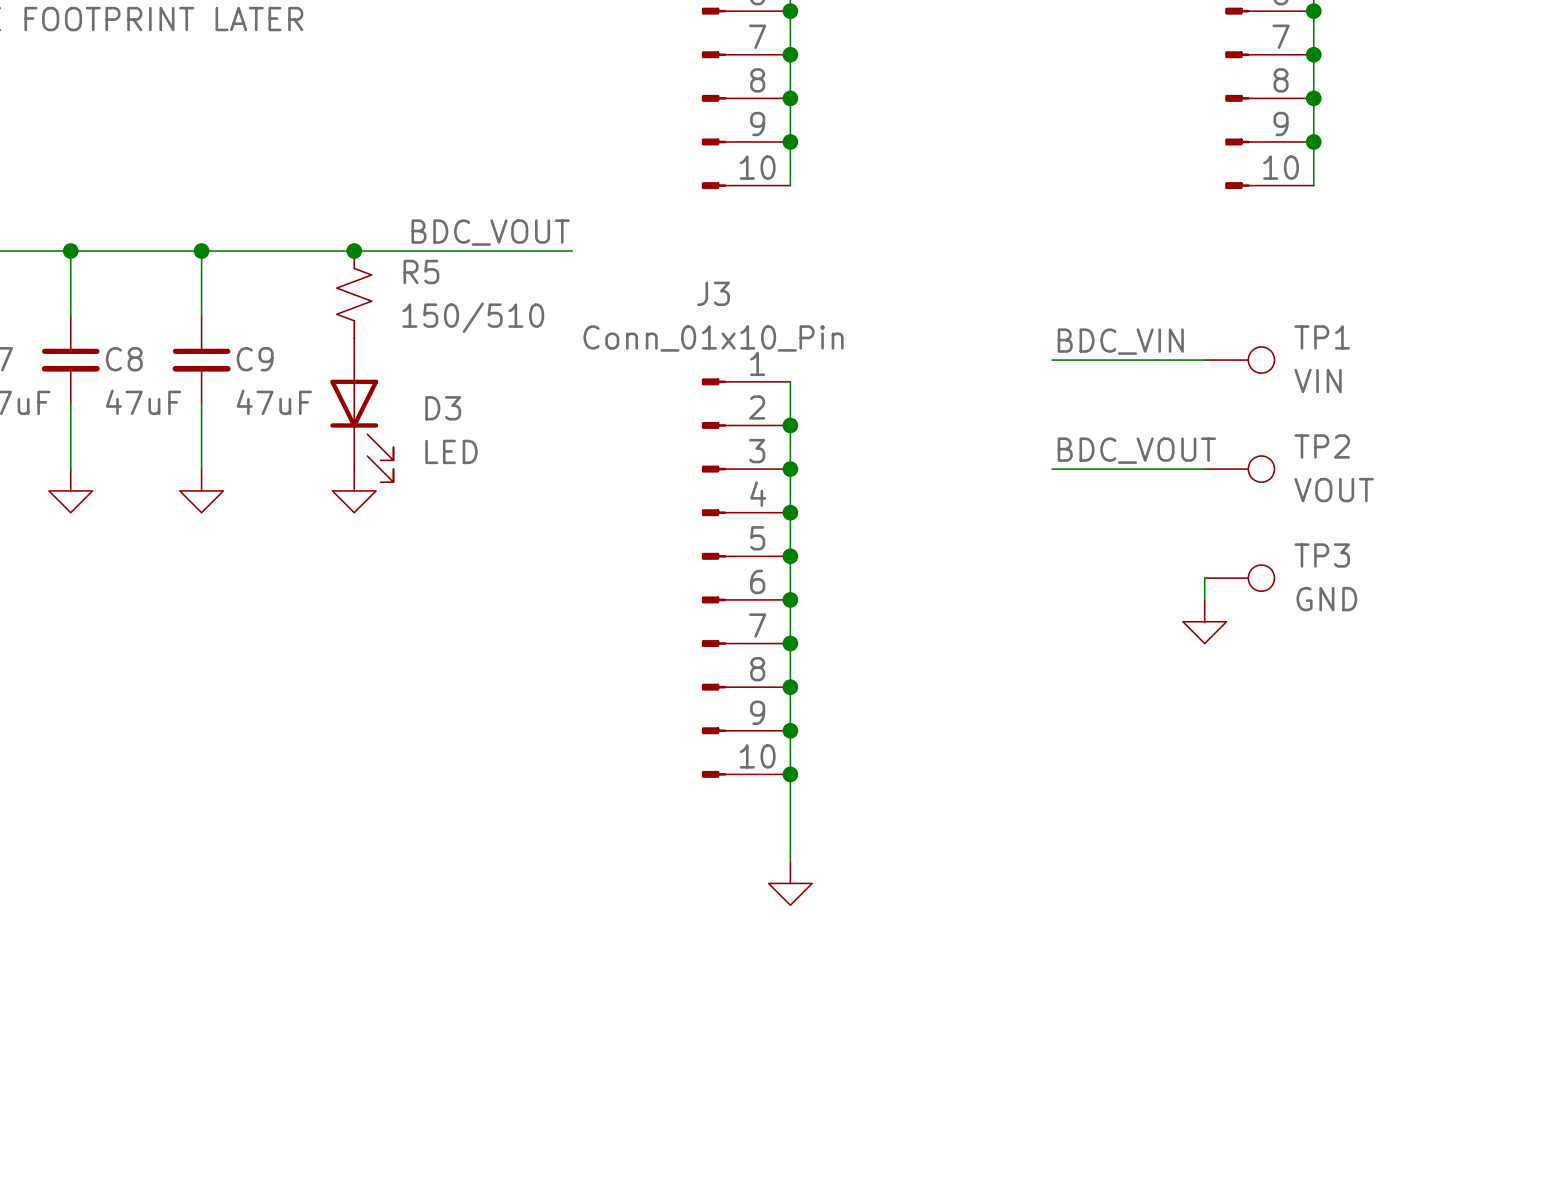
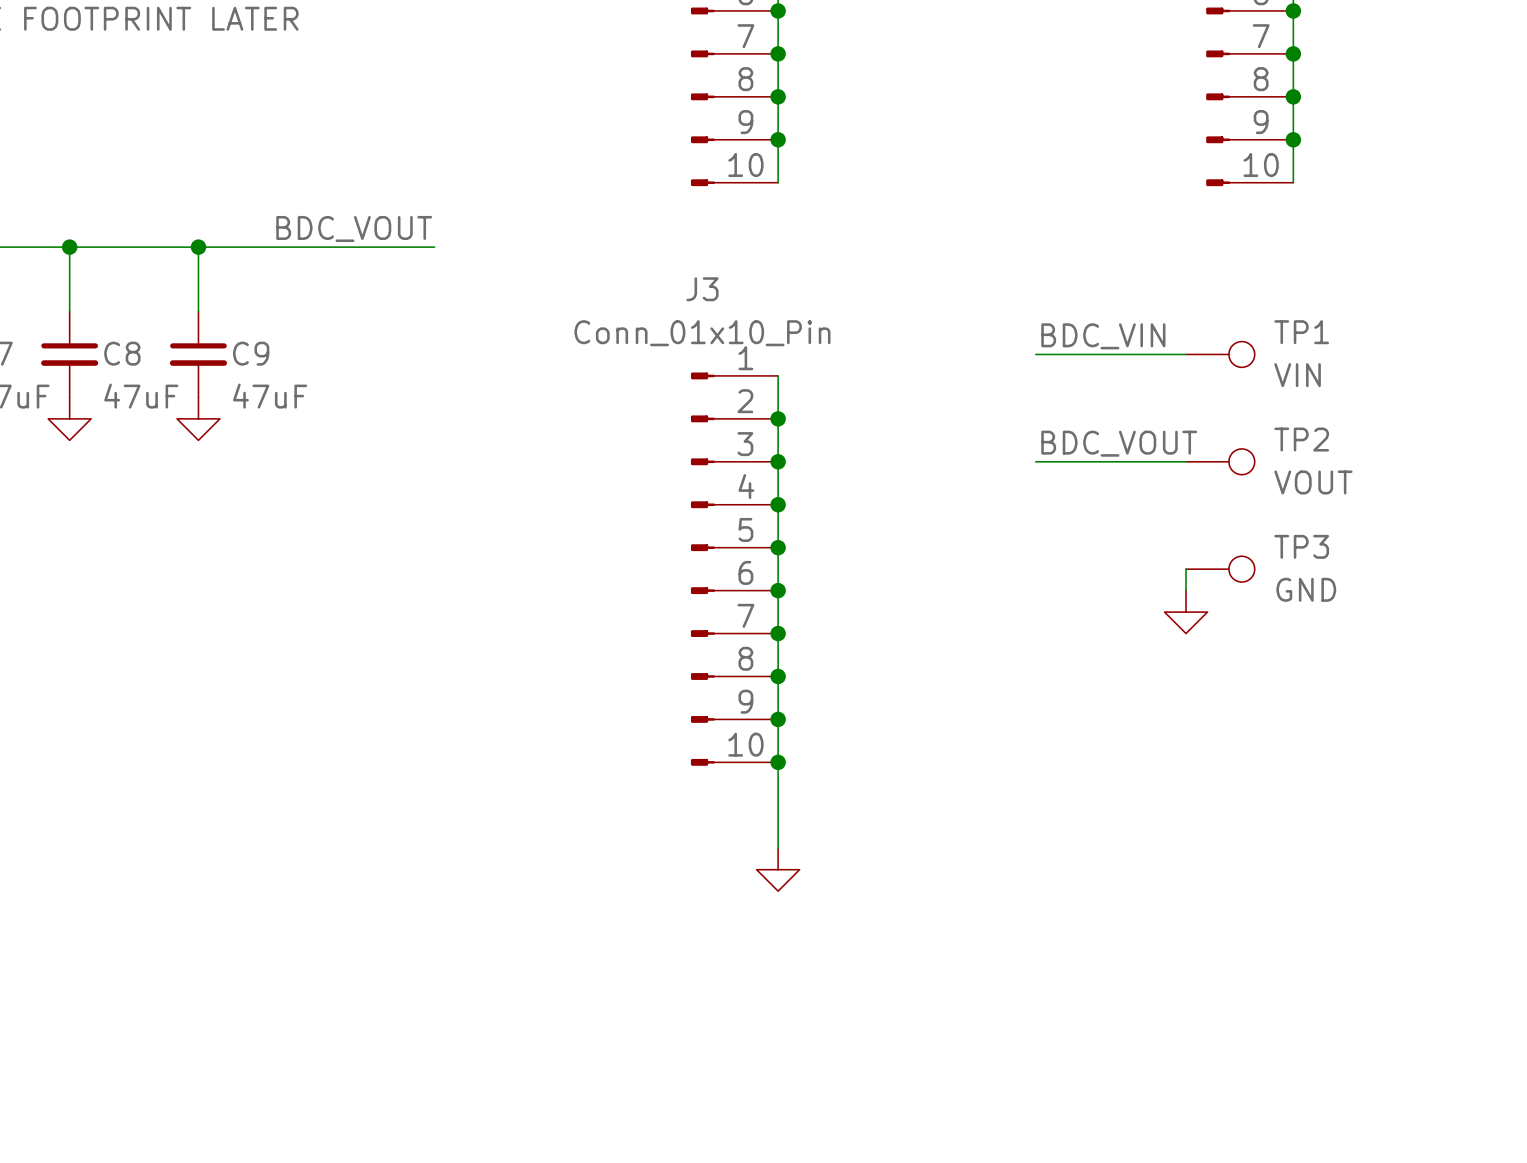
label position: BDC_VOUT (490, 232) -> BDC_VOUT (354, 228)
junction: (354, 251) -> none
wire: (441, 251) (572, 251) -> none
R5: 150/510 (354, 294) -> none
wire: (70, 403) (70, 469) -> none
wire: (201, 403) (201, 469) -> none
D3: LED (361, 410) -> none
power symbol position: (70, 490) -> (69, 418)
power symbol position: (201, 490) -> (198, 418)
power symbol: (354, 490) -> none

